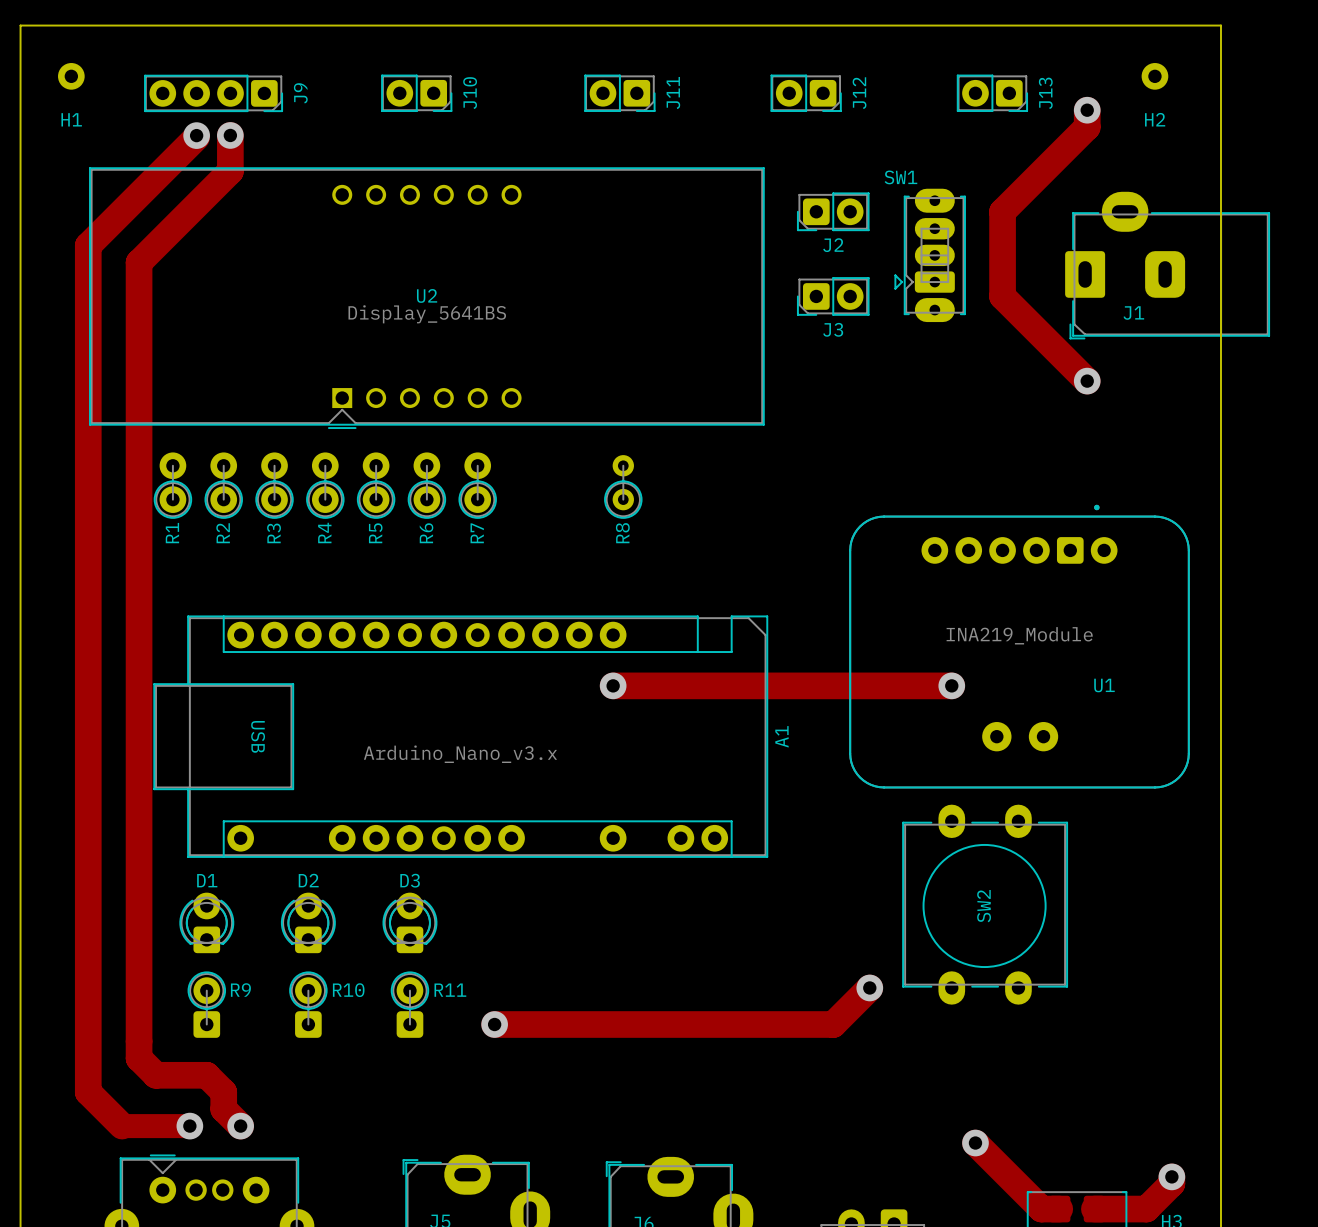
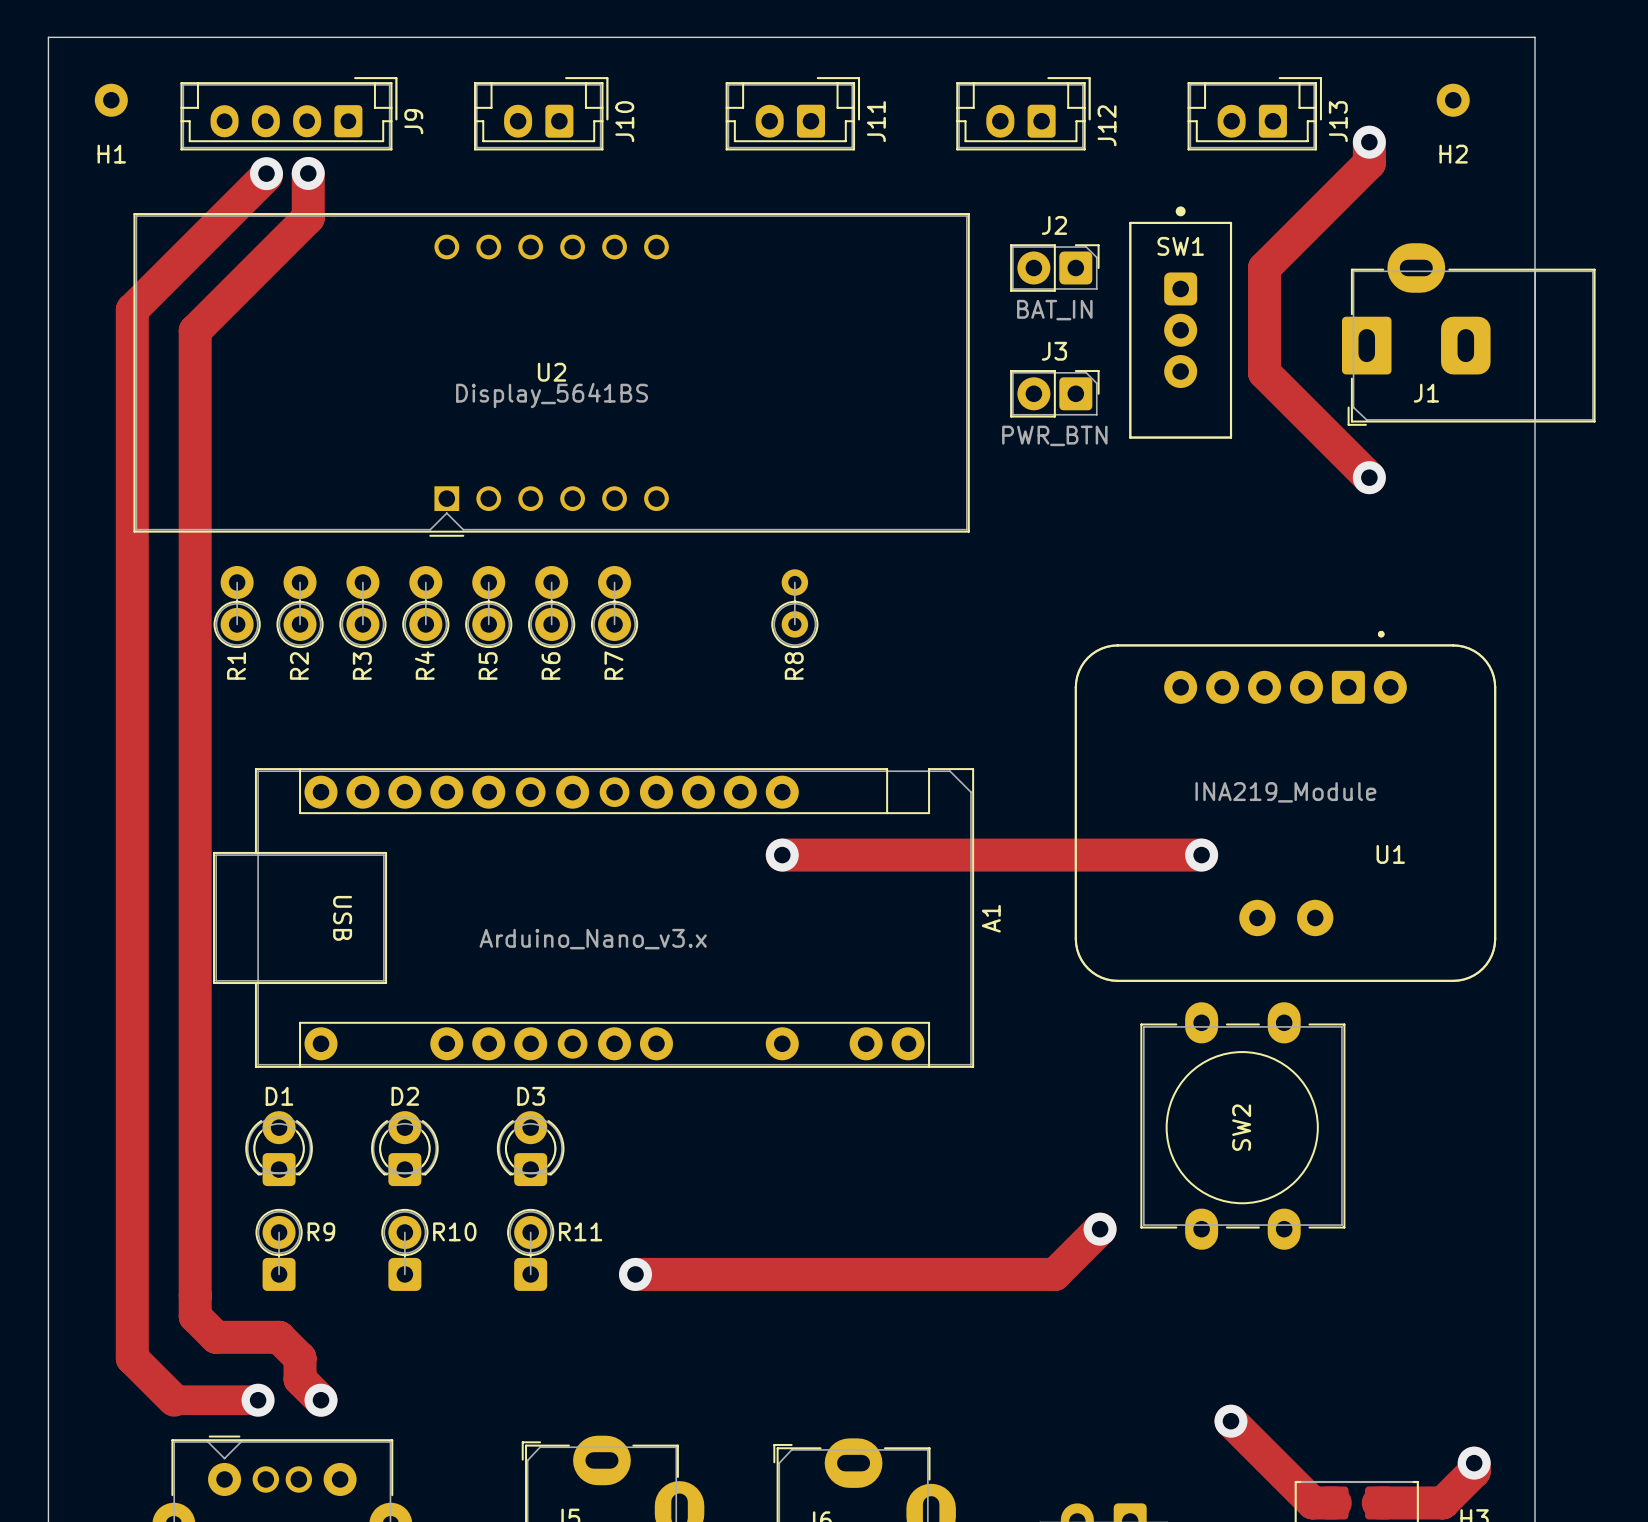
J9 footprint: [144, 74, 283, 112] -> [180, 77, 398, 151]
J10 footprint: [381, 74, 453, 112] -> [474, 77, 609, 151]
J11 footprint: [584, 74, 656, 112] -> [725, 77, 861, 151]
J12 footprint: [770, 74, 842, 112] -> [956, 77, 1091, 151]
J13 footprint: [956, 74, 1028, 112] -> [1187, 77, 1322, 151]
SW1 name position: SW1 (900, 177) -> SW1 (1180, 246)
SW1 footprint: [894, 188, 966, 323] -> [1129, 206, 1233, 439]
J2 rotation: 0° (833, 211) -> 180° (1054, 267)
J2 value: none -> BAT_IN (1054, 310)
J3 rotation: 0° (833, 296) -> 180° (1054, 393)
J3 value: none -> PWR_BTN (1054, 435)

